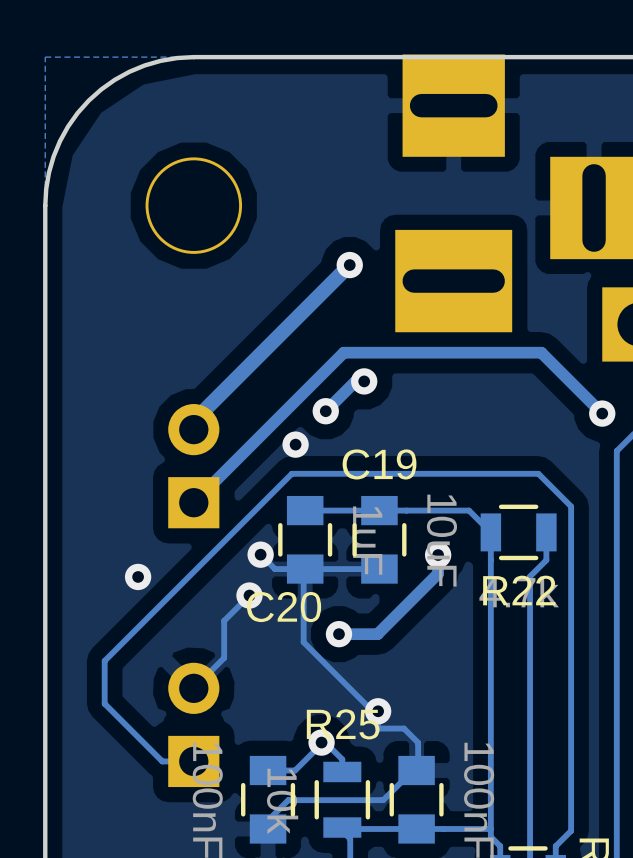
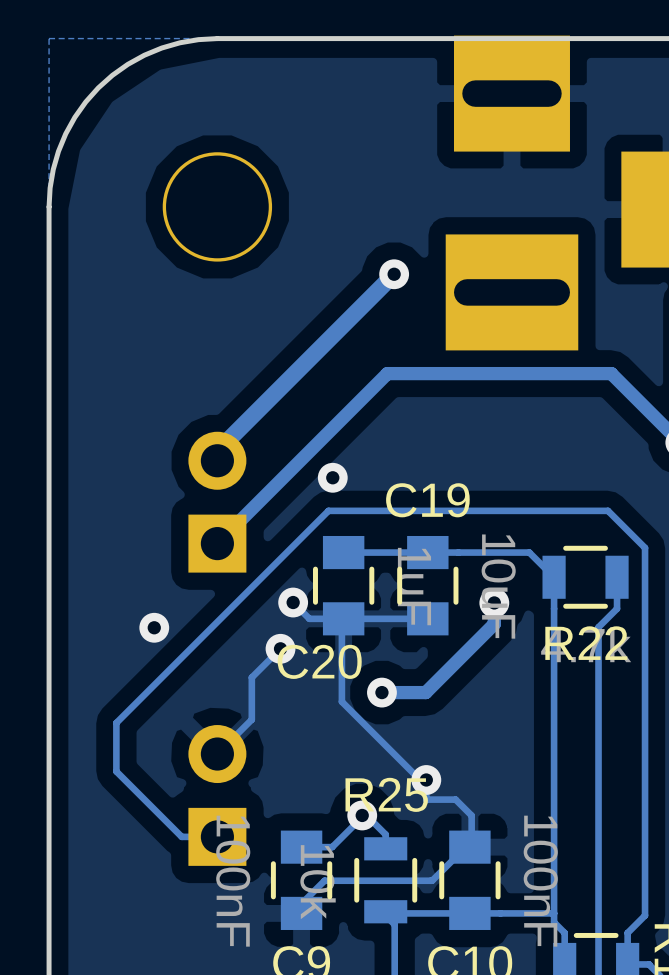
track: (364, 381) (355, 381) (325, 411) -> none
via: (364, 381) -> none
via: (325, 411) -> none

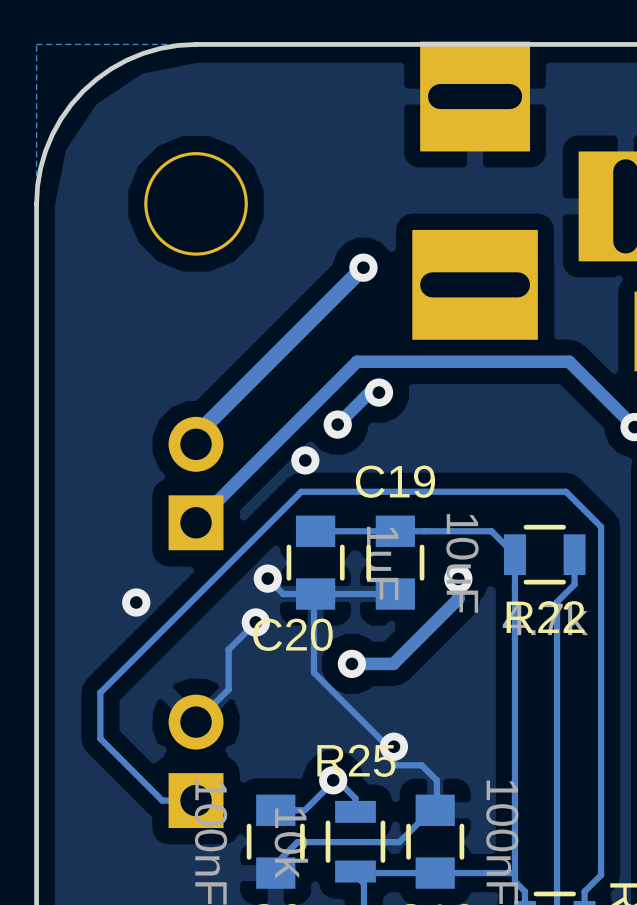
track: none -> (378, 392) (369, 392) (337, 424)
via: none -> (378, 392)
via: none -> (337, 424)

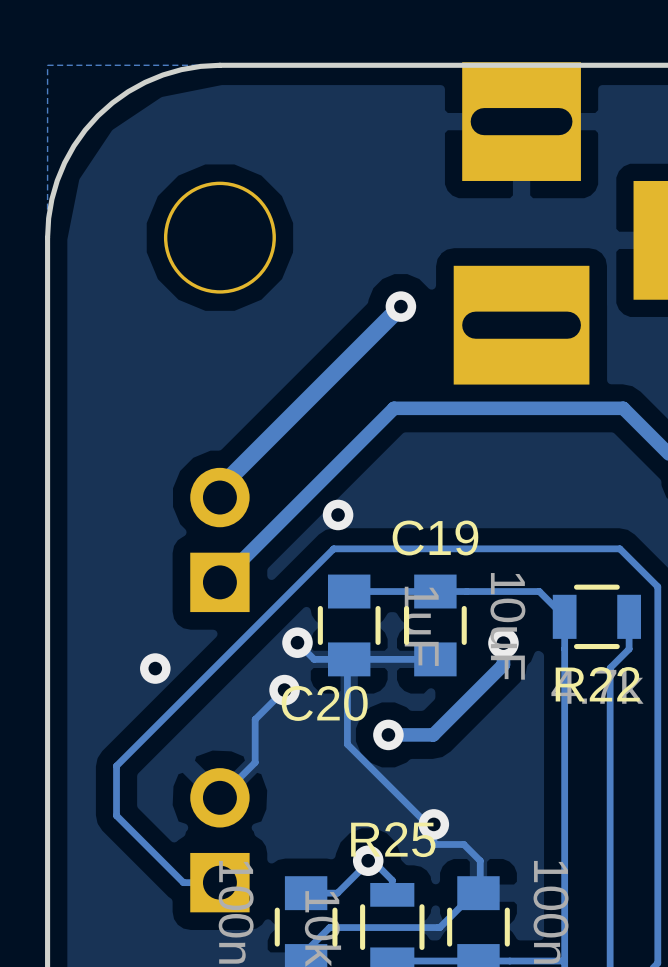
track: (378, 392) (369, 392) (337, 424) -> none
via: (378, 392) -> none
via: (337, 424) -> none

